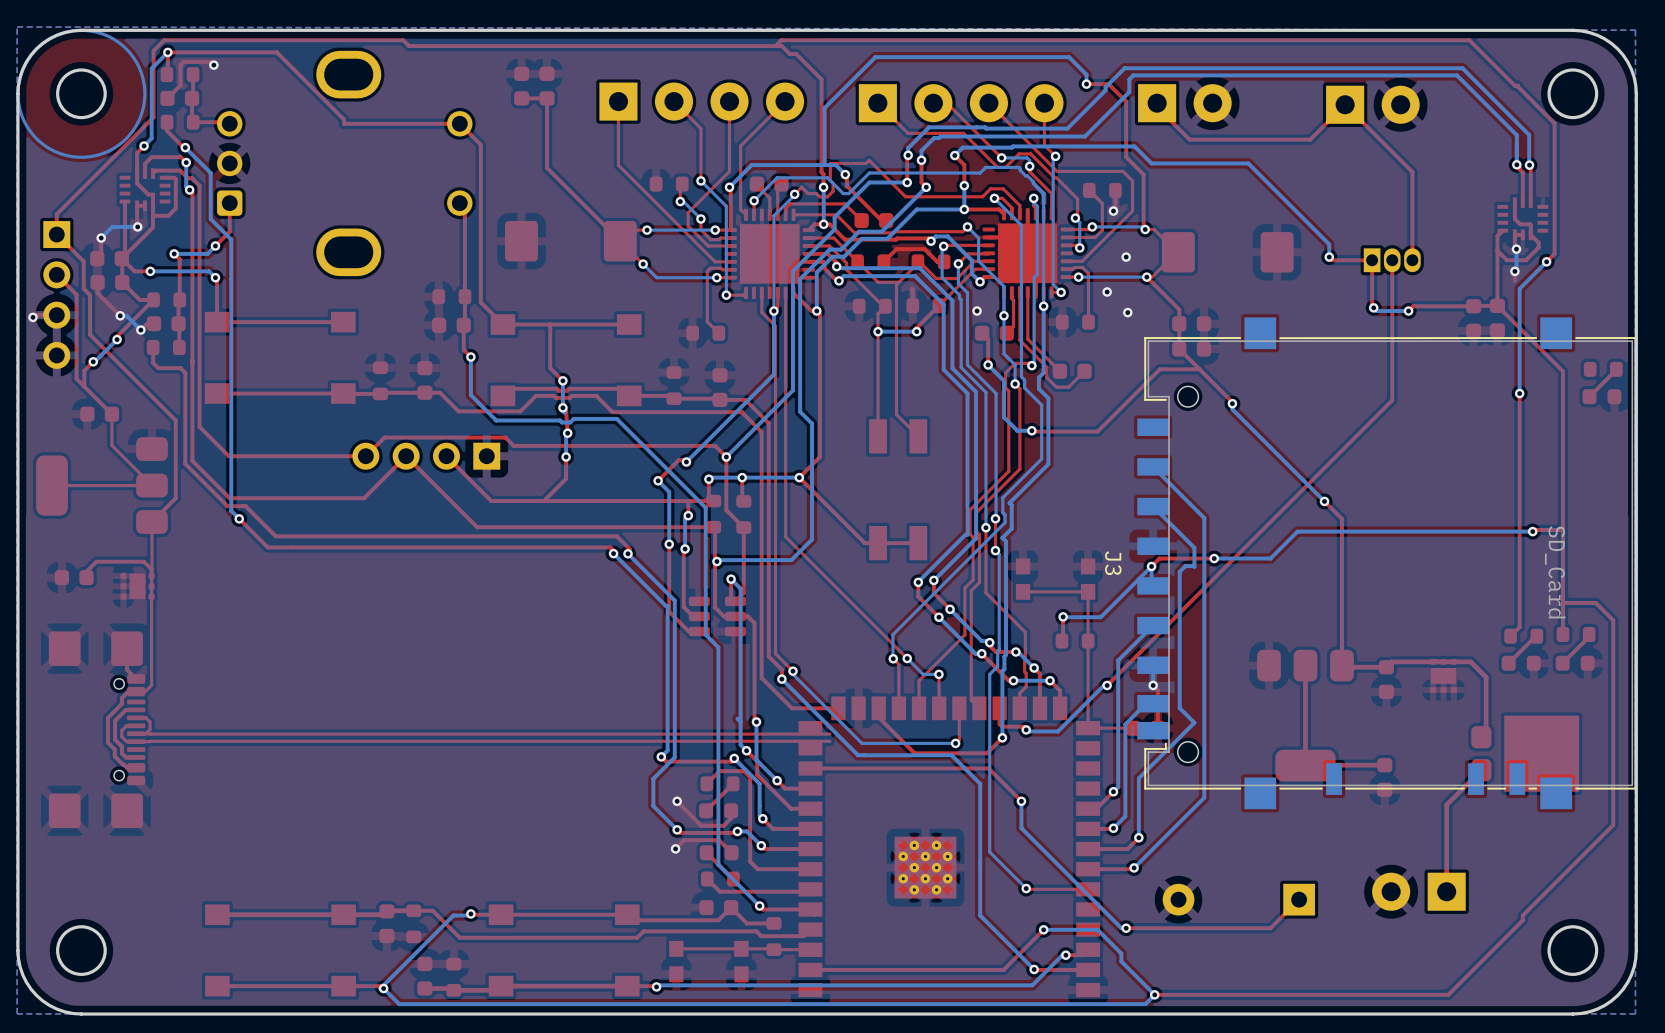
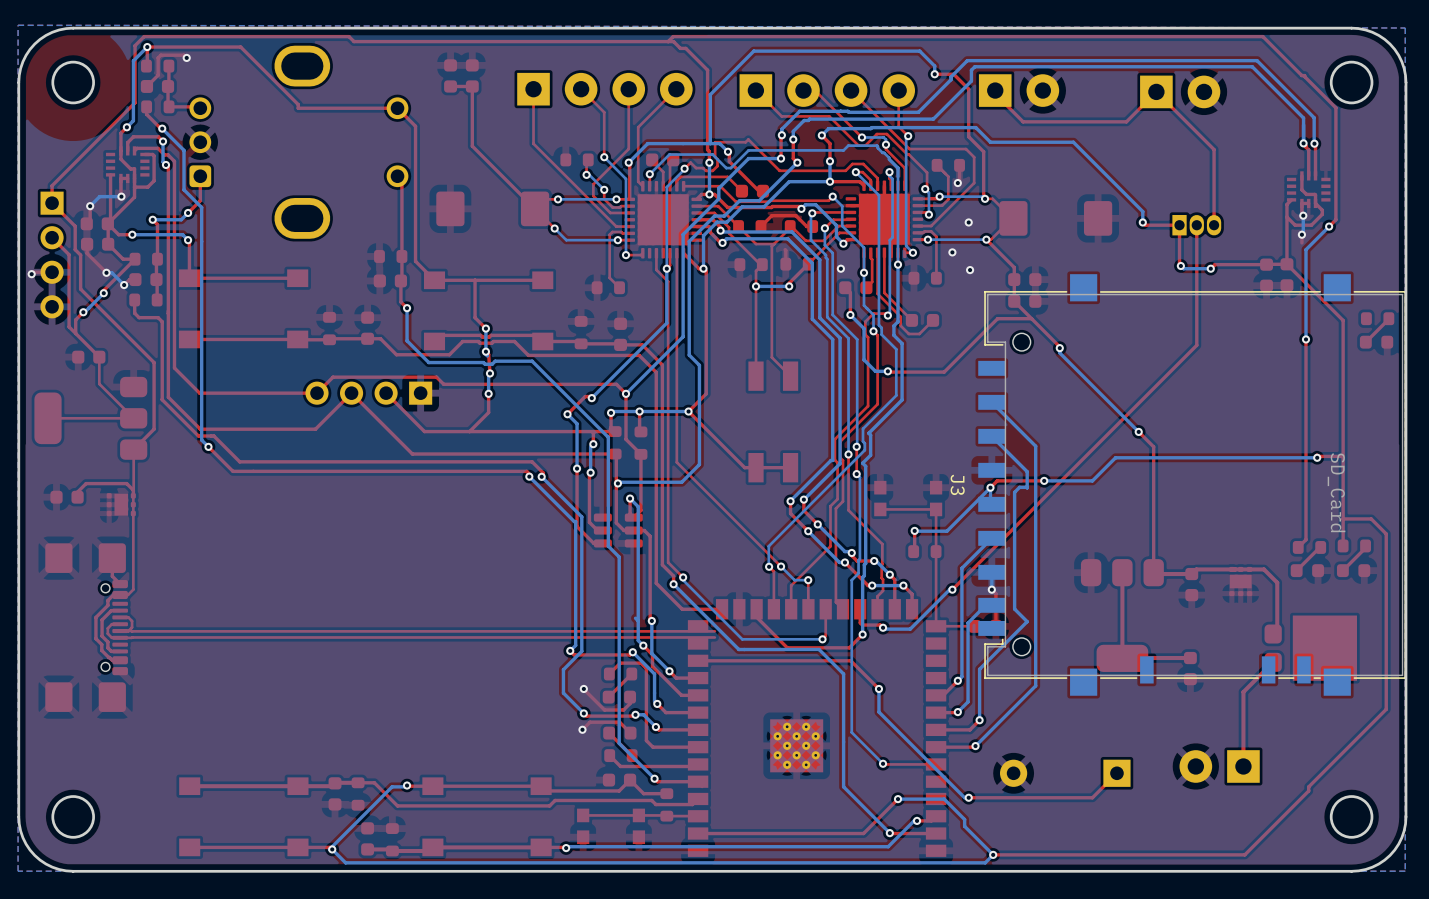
drawing: [16, 28, 147, 159] -> none

